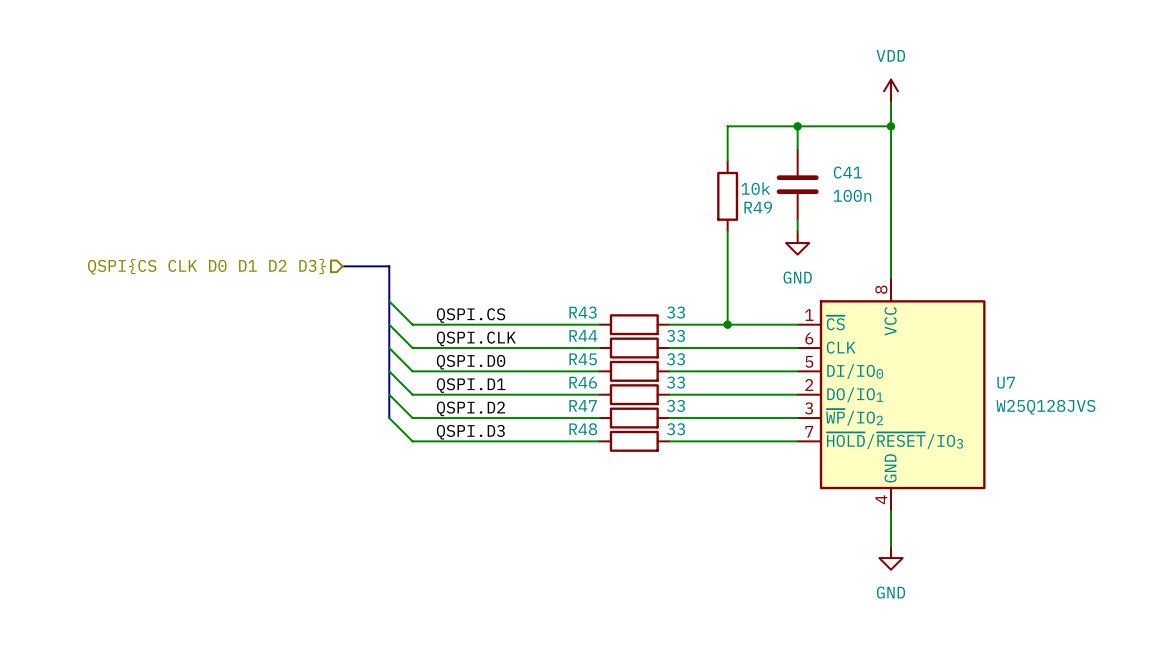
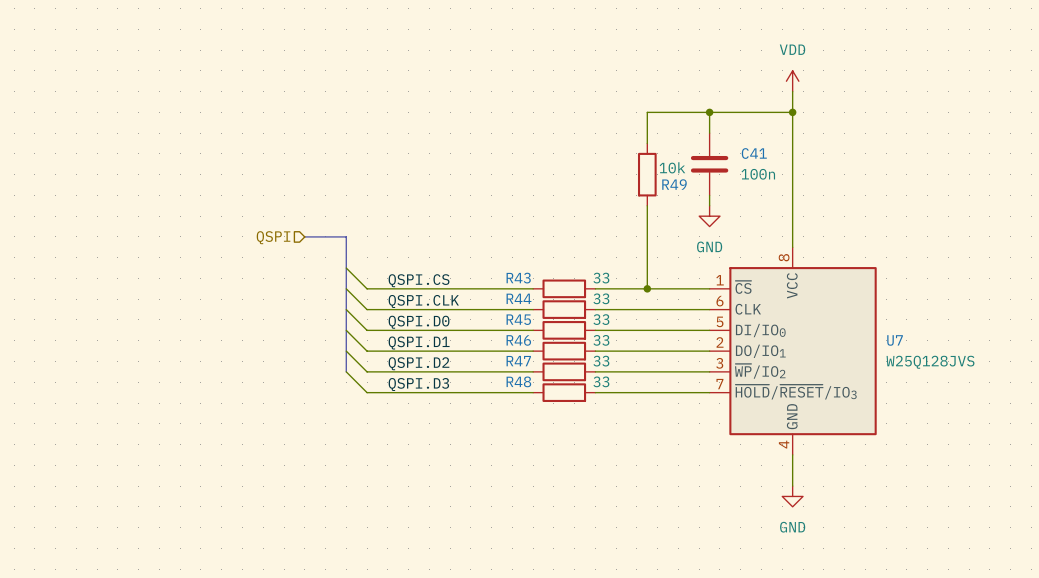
hierarchical label: QSPI{CS CLK D0 D1 D2 D3} (207, 266) -> QSPI (273, 237)

